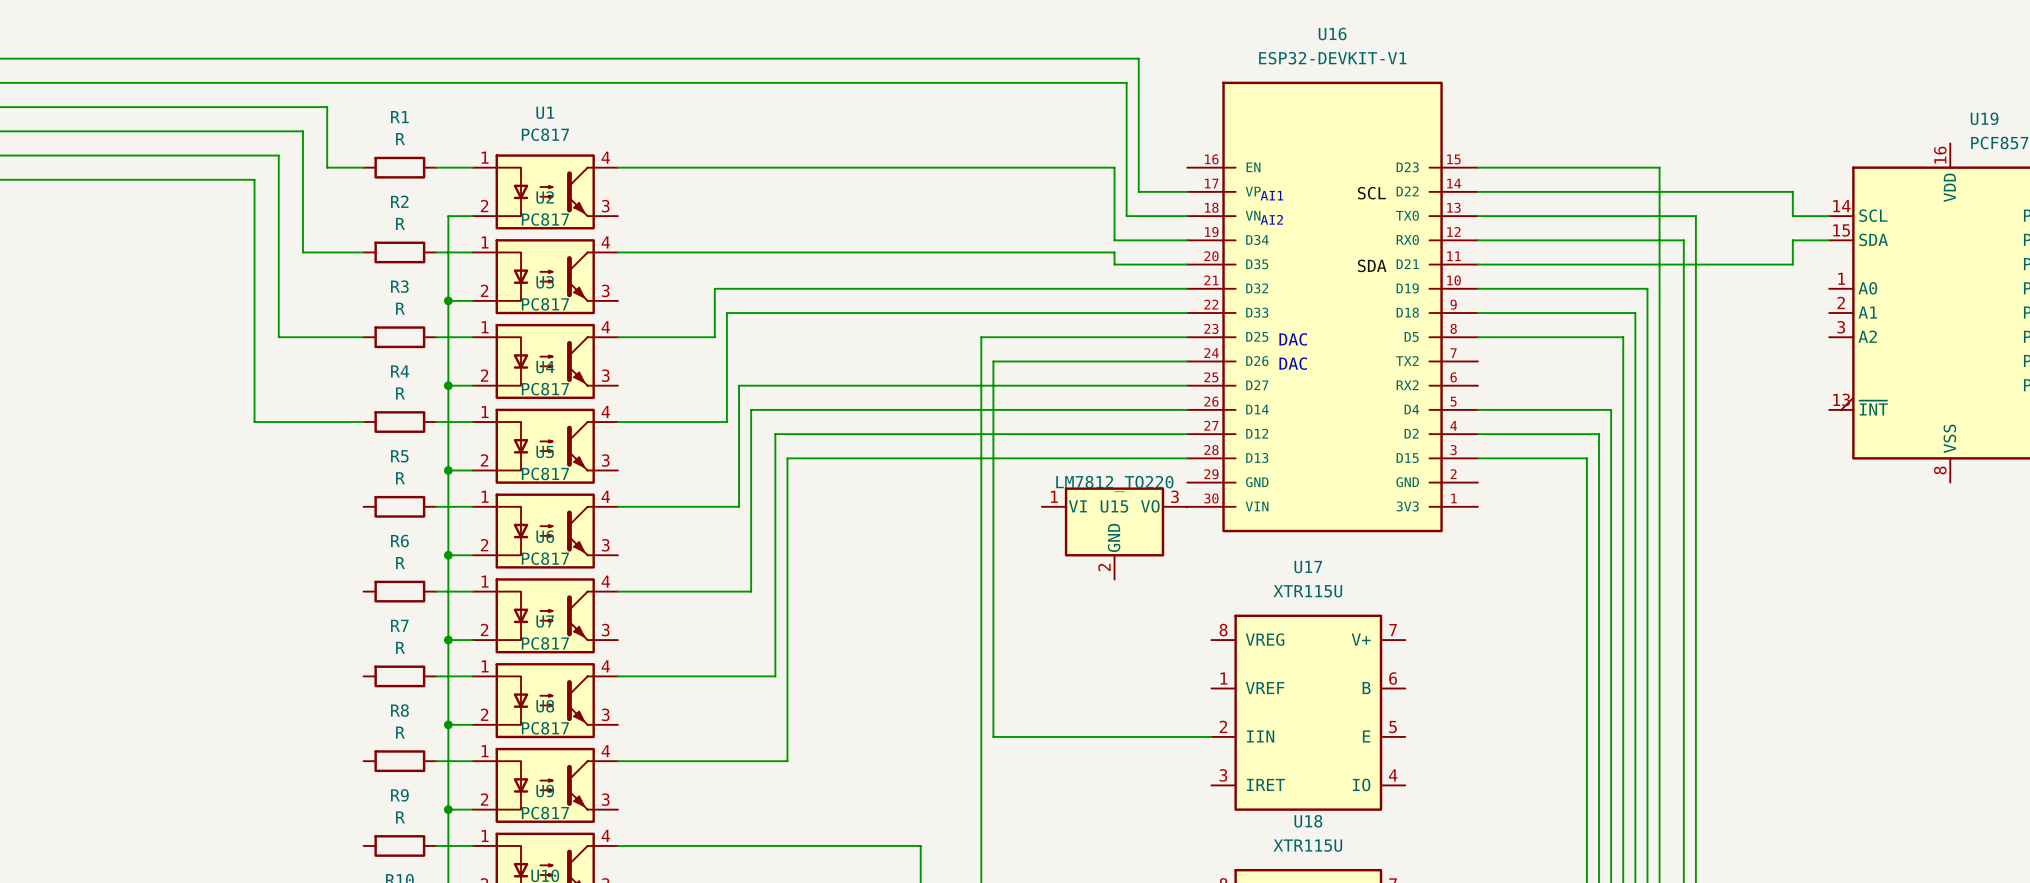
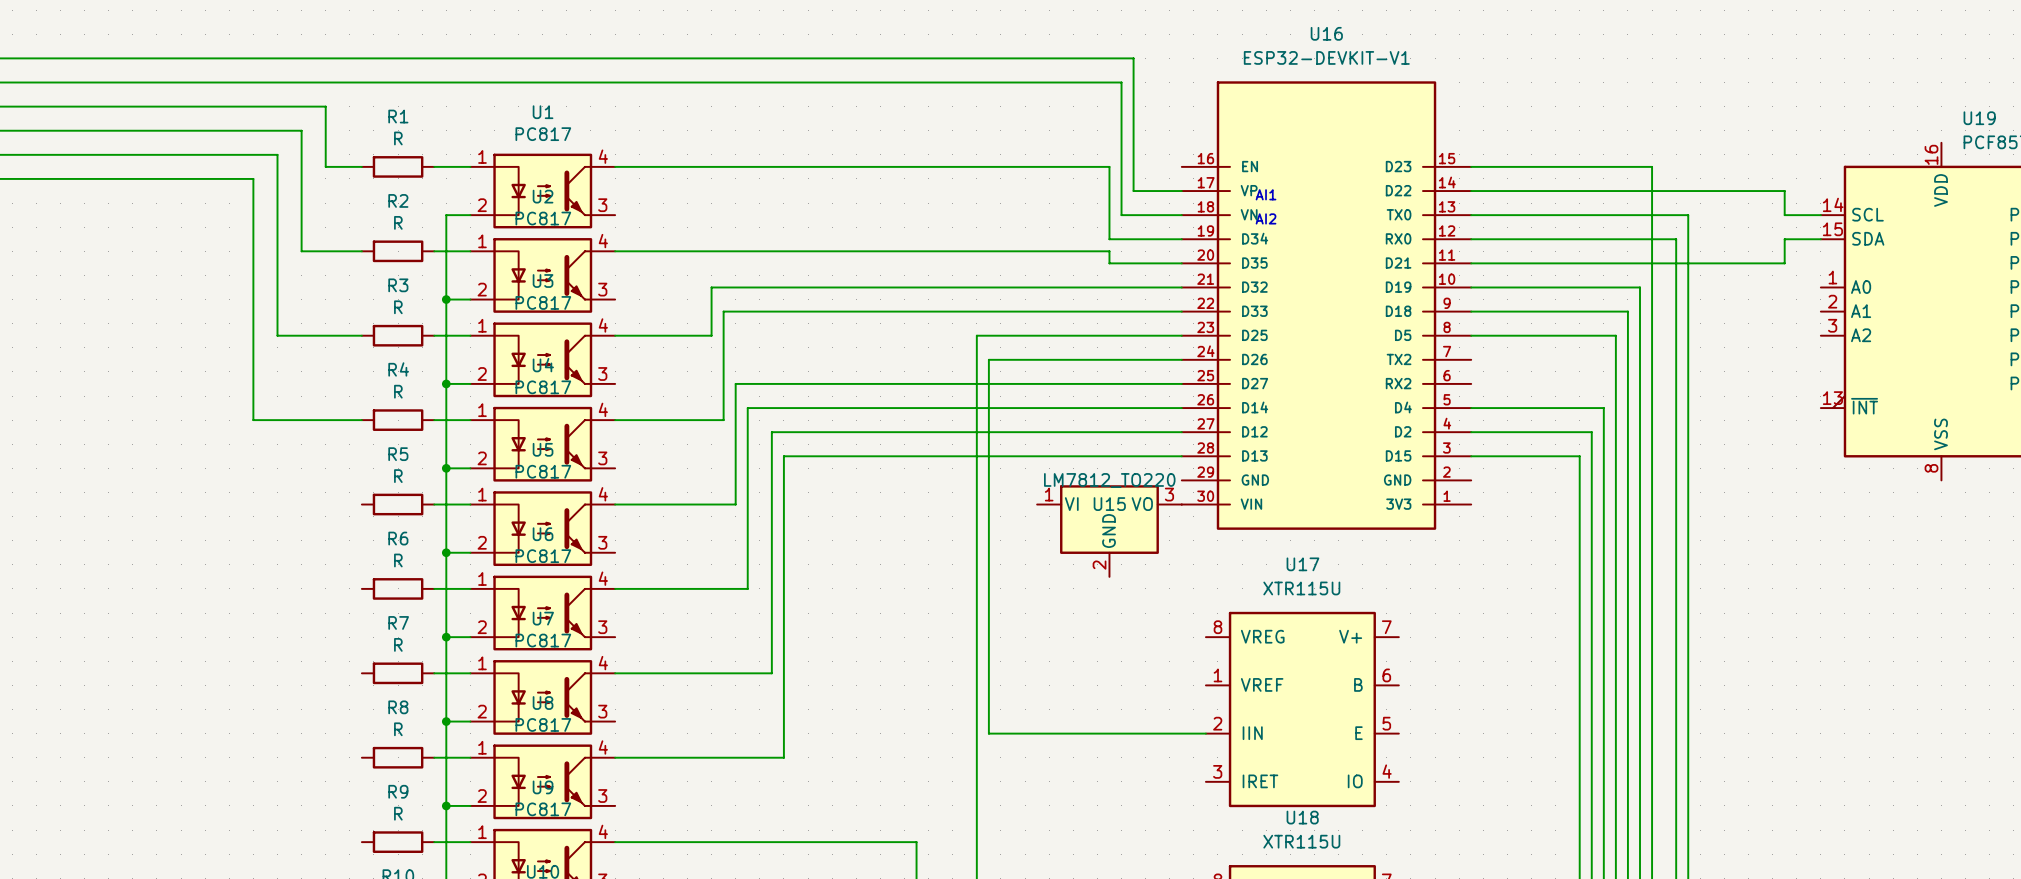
label: SCL (1371, 193) -> none
label: SDA (1372, 265) -> none
text: DAC (1293, 339) -> none
text: DAC (1293, 363) -> none

